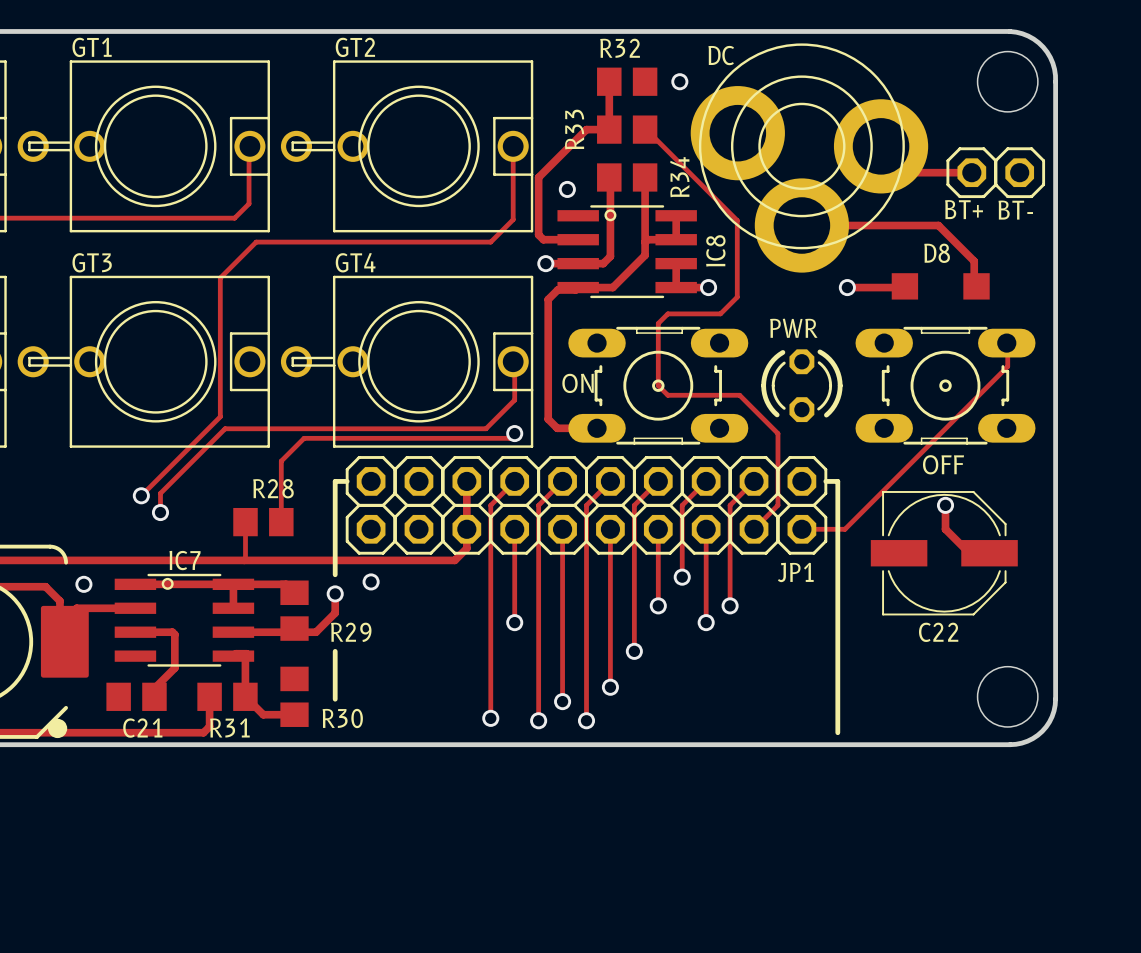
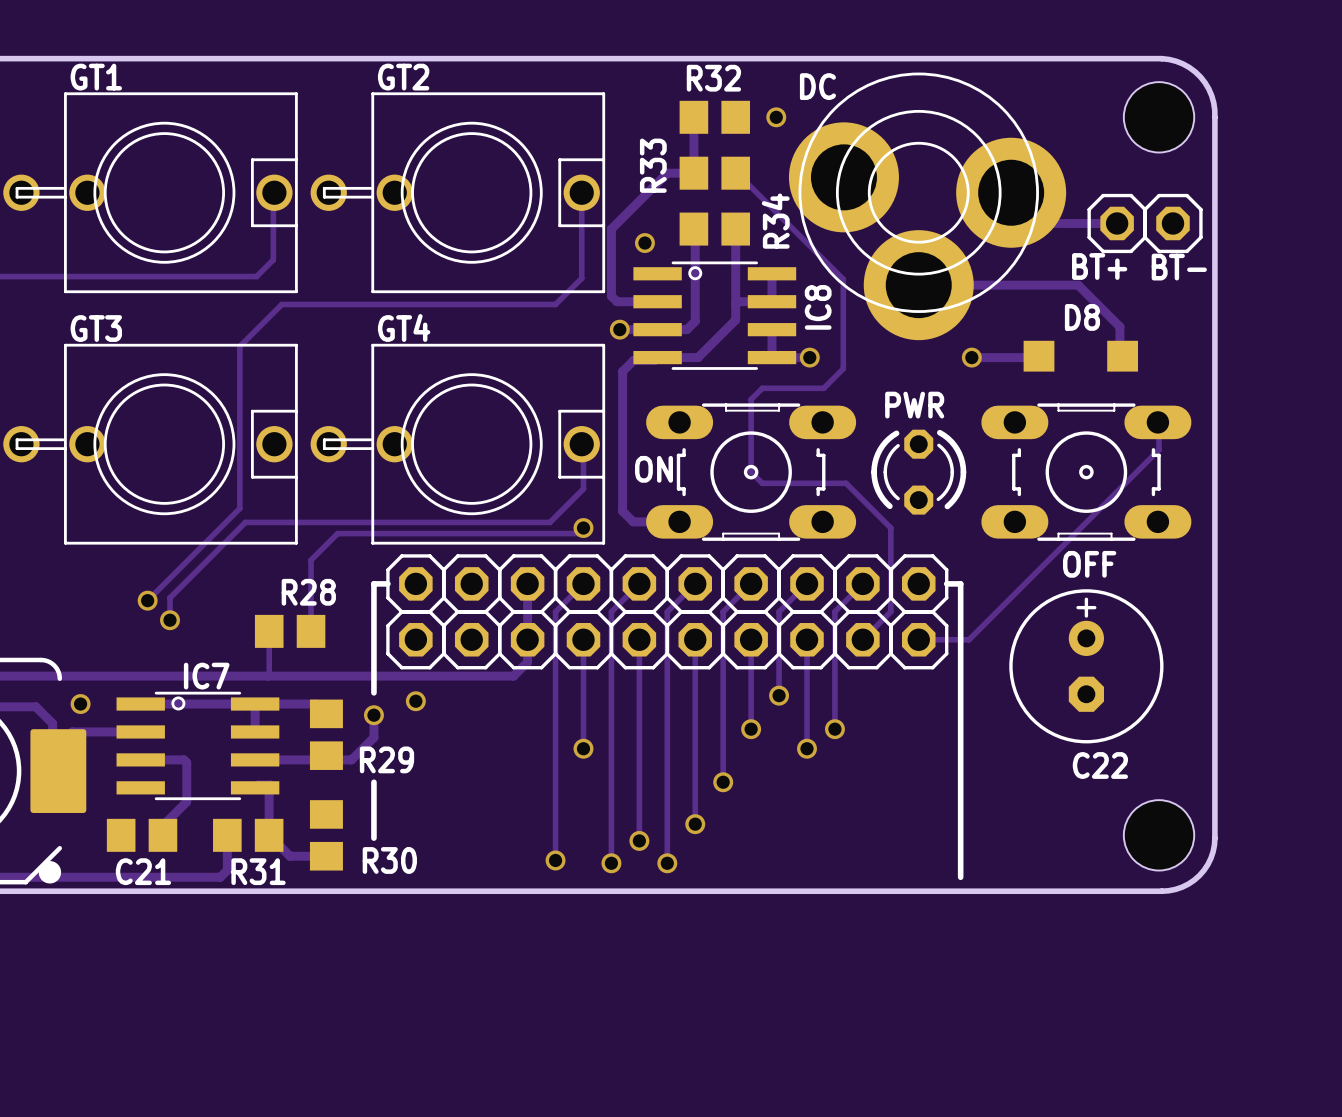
C22 footprint: [870, 491, 1018, 616] -> [1009, 589, 1164, 744]
track: (945, 505) (945, 529) (969, 553) (989, 553) -> none
via: (945, 505) -> none
text: JP1 (795, 572) -> none

